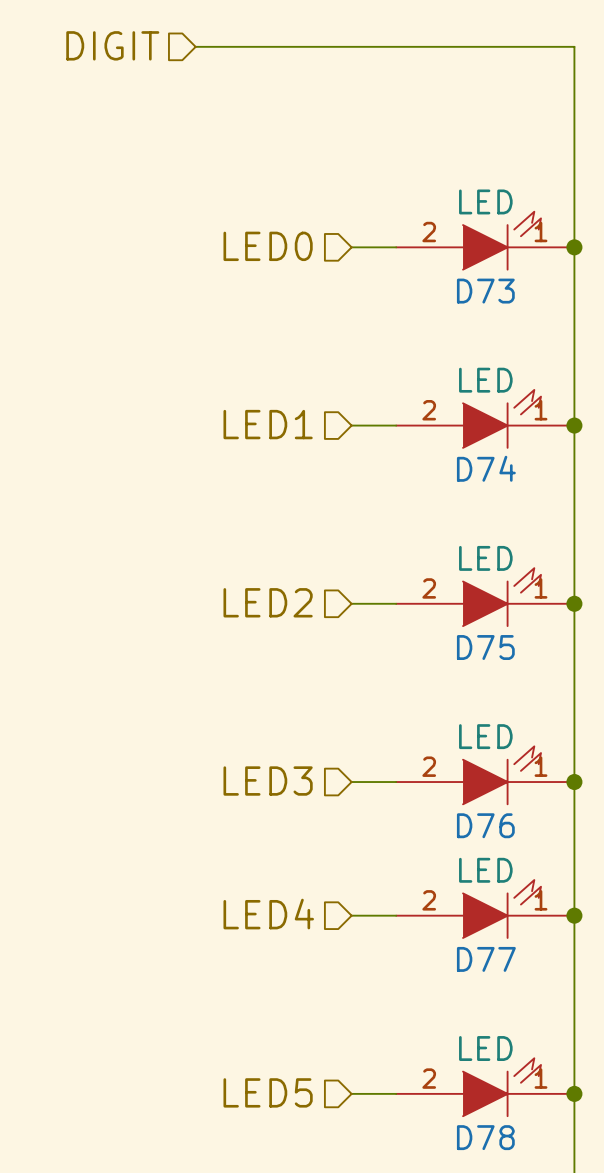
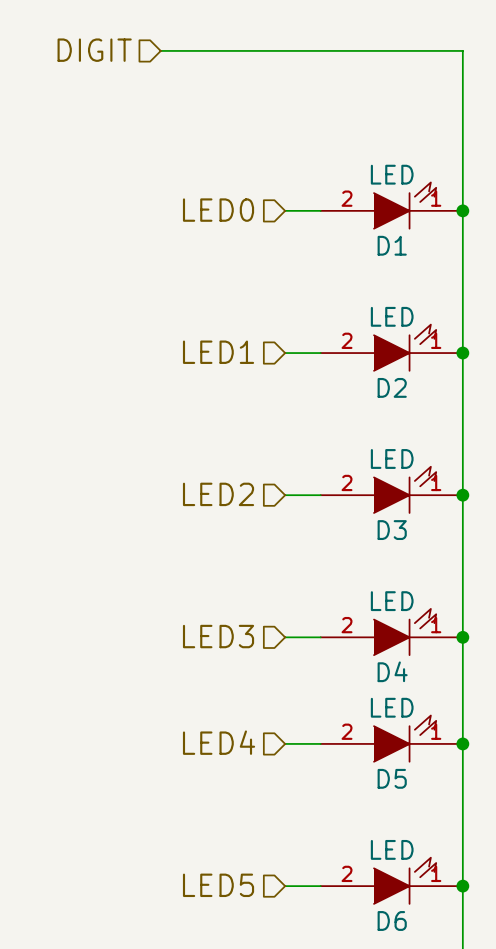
D73 name: D73 (485, 291) -> D1 (392, 245)
D74 name: D74 (486, 468) -> D2 (392, 387)
D75 name: D75 (485, 647) -> D3 (392, 530)
D76 name: D76 (485, 825) -> D4 (392, 671)
D77 name: D77 (486, 959) -> D5 (392, 778)
D78 name: D78 (485, 1137) -> D6 (392, 920)

